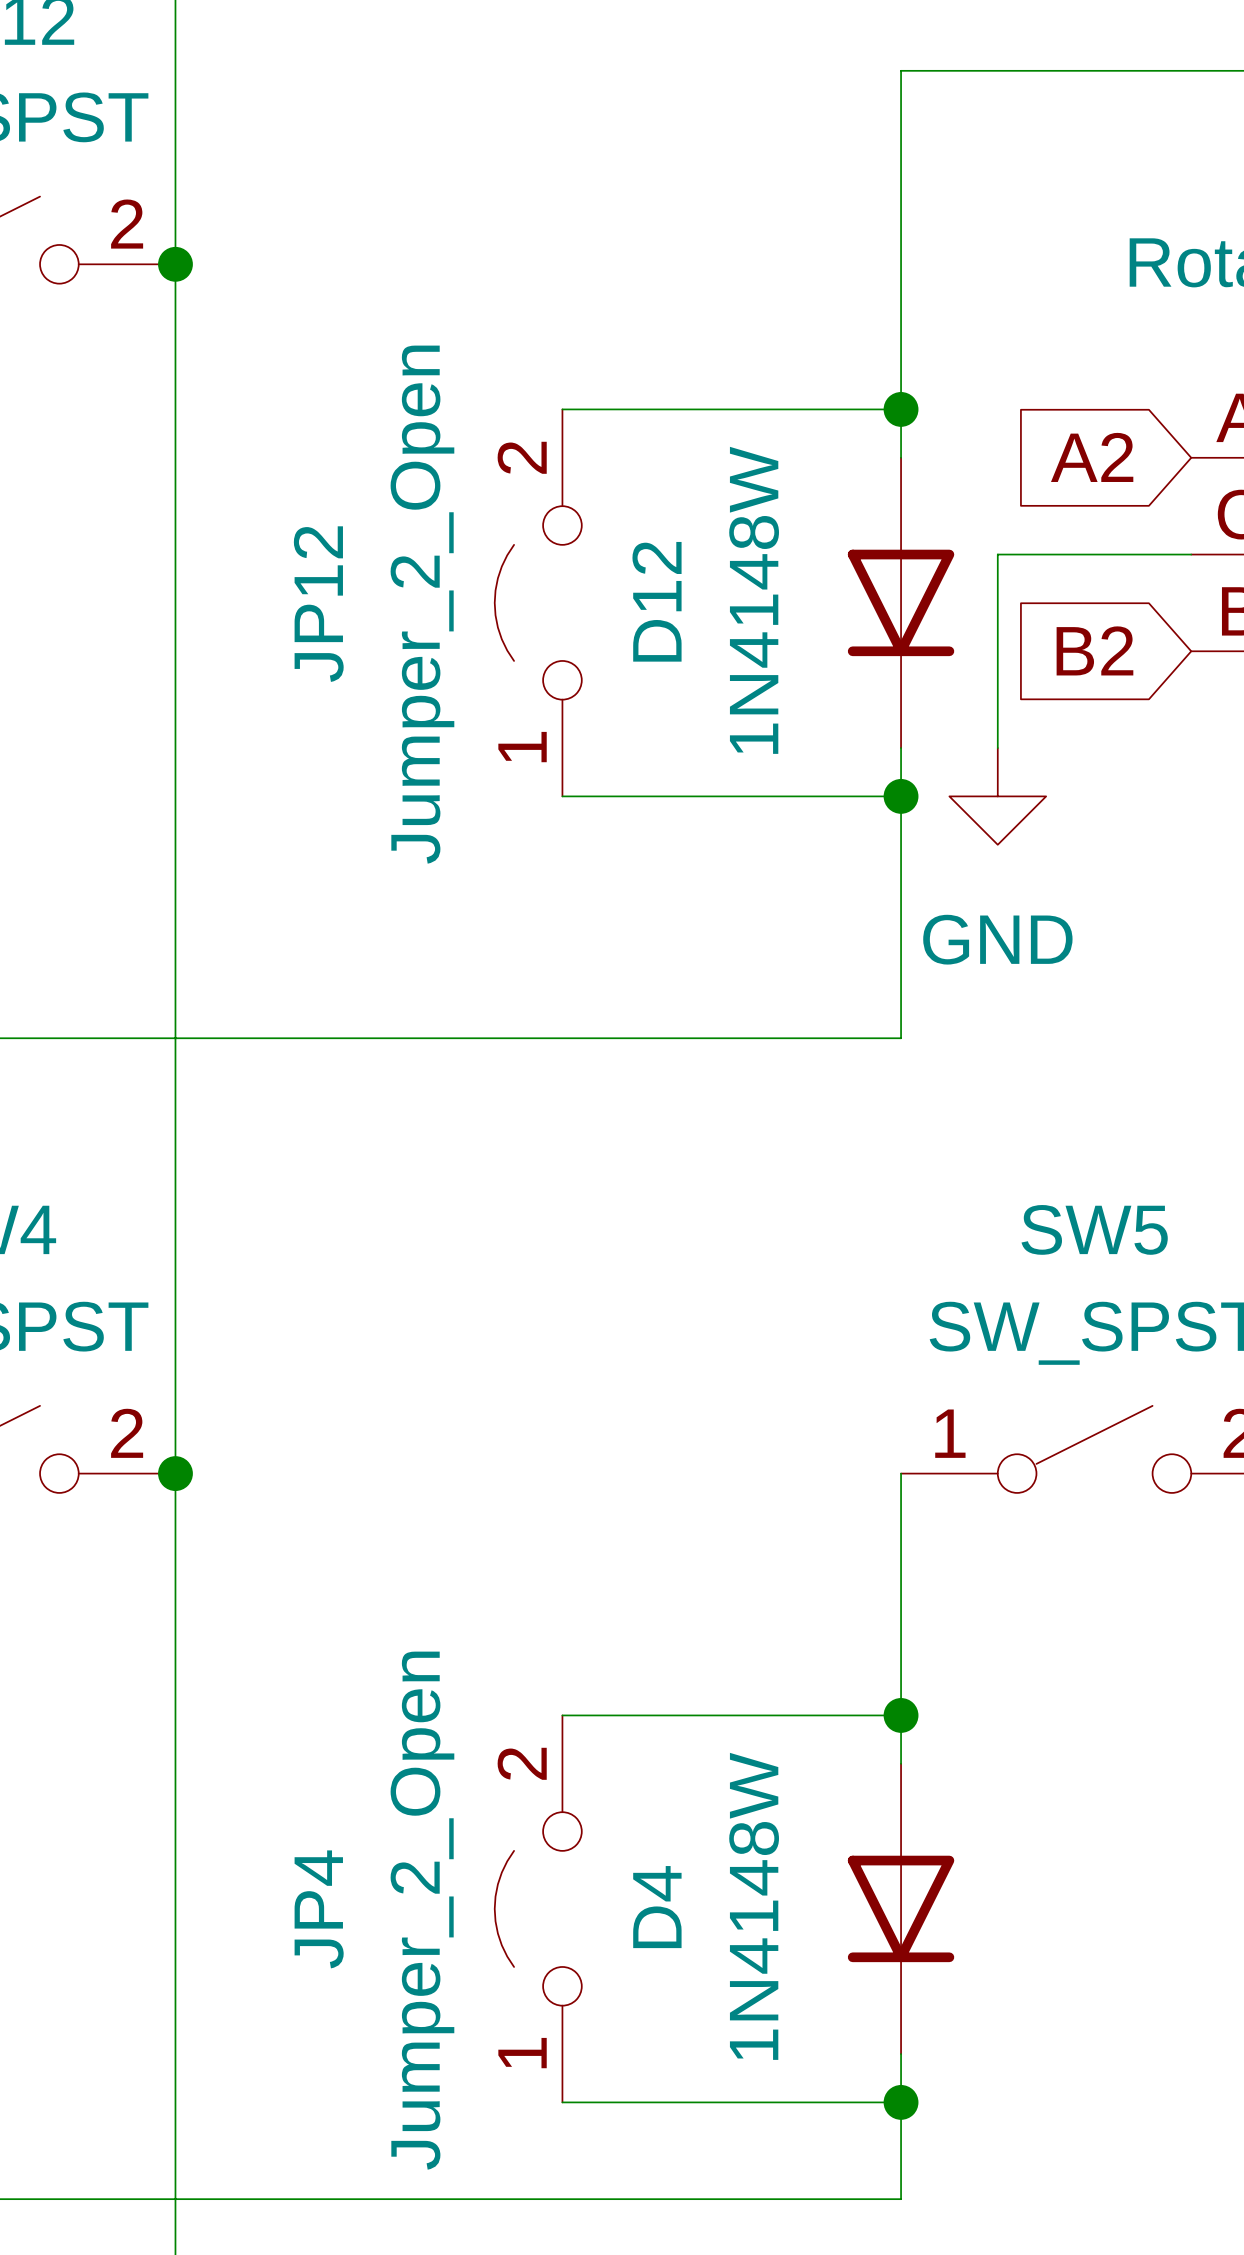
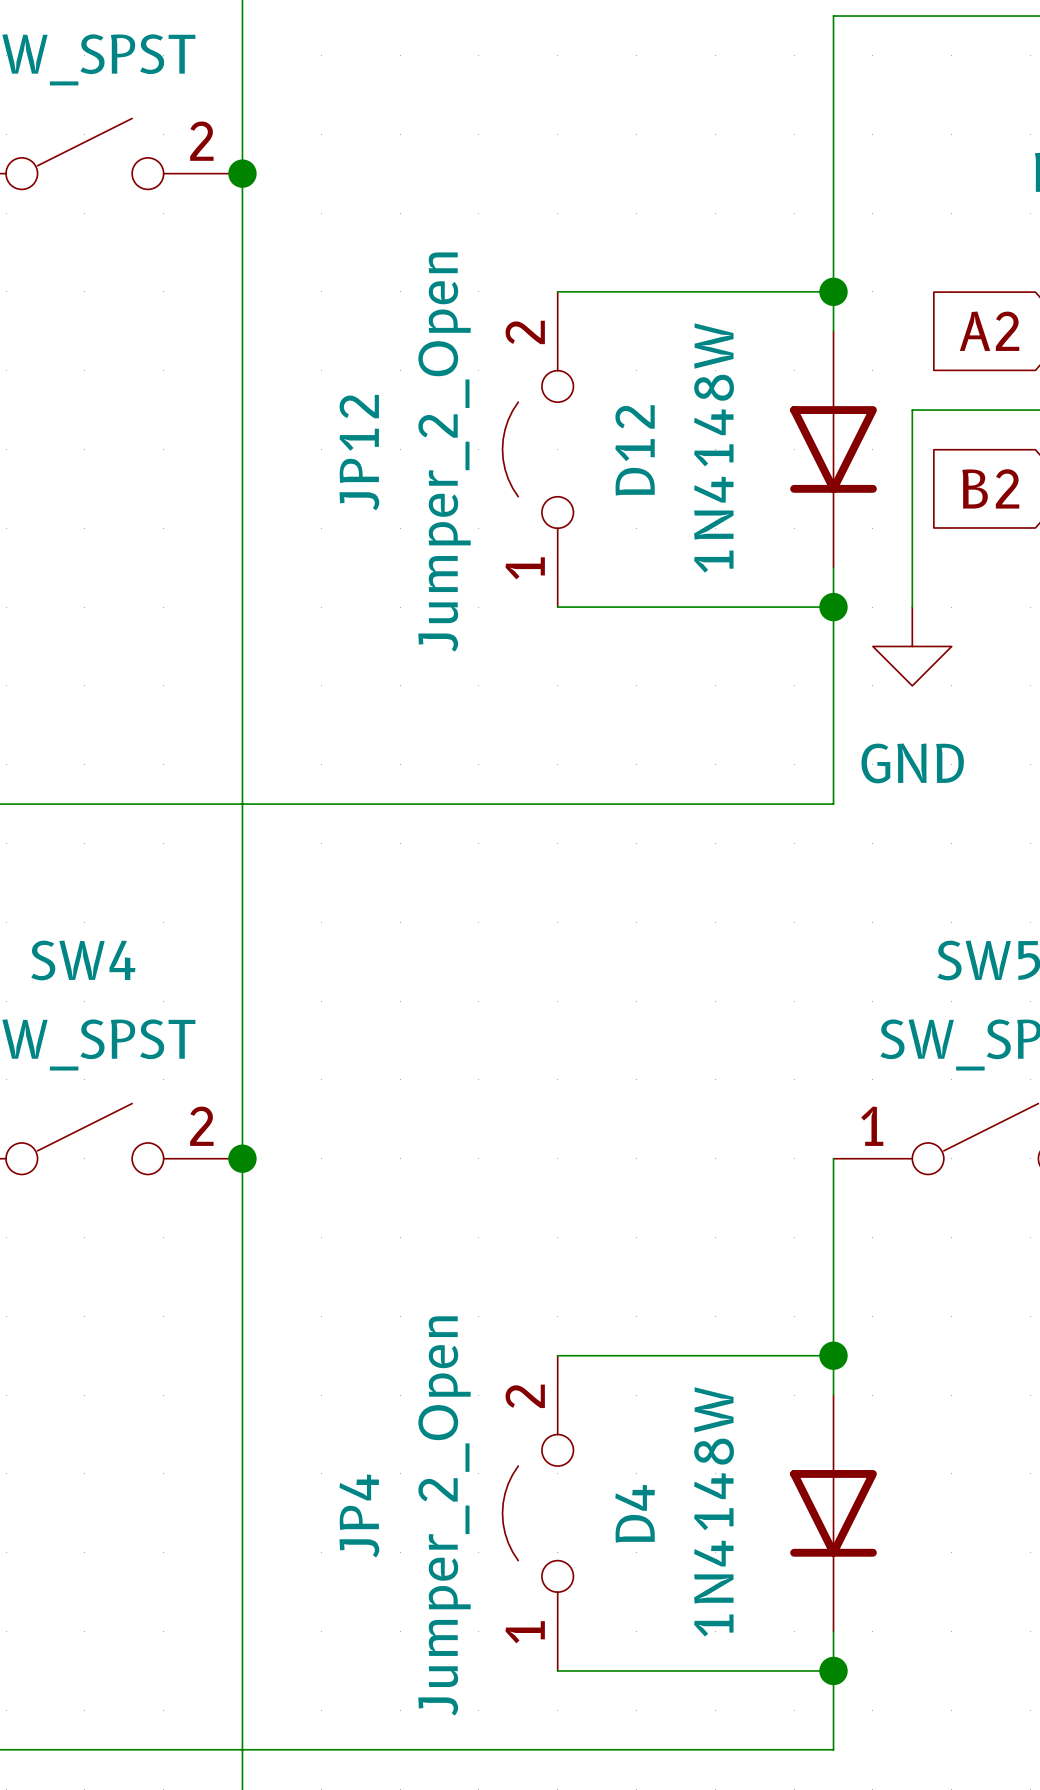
power symbol position: GND (997, 796) -> GND (912, 646)

